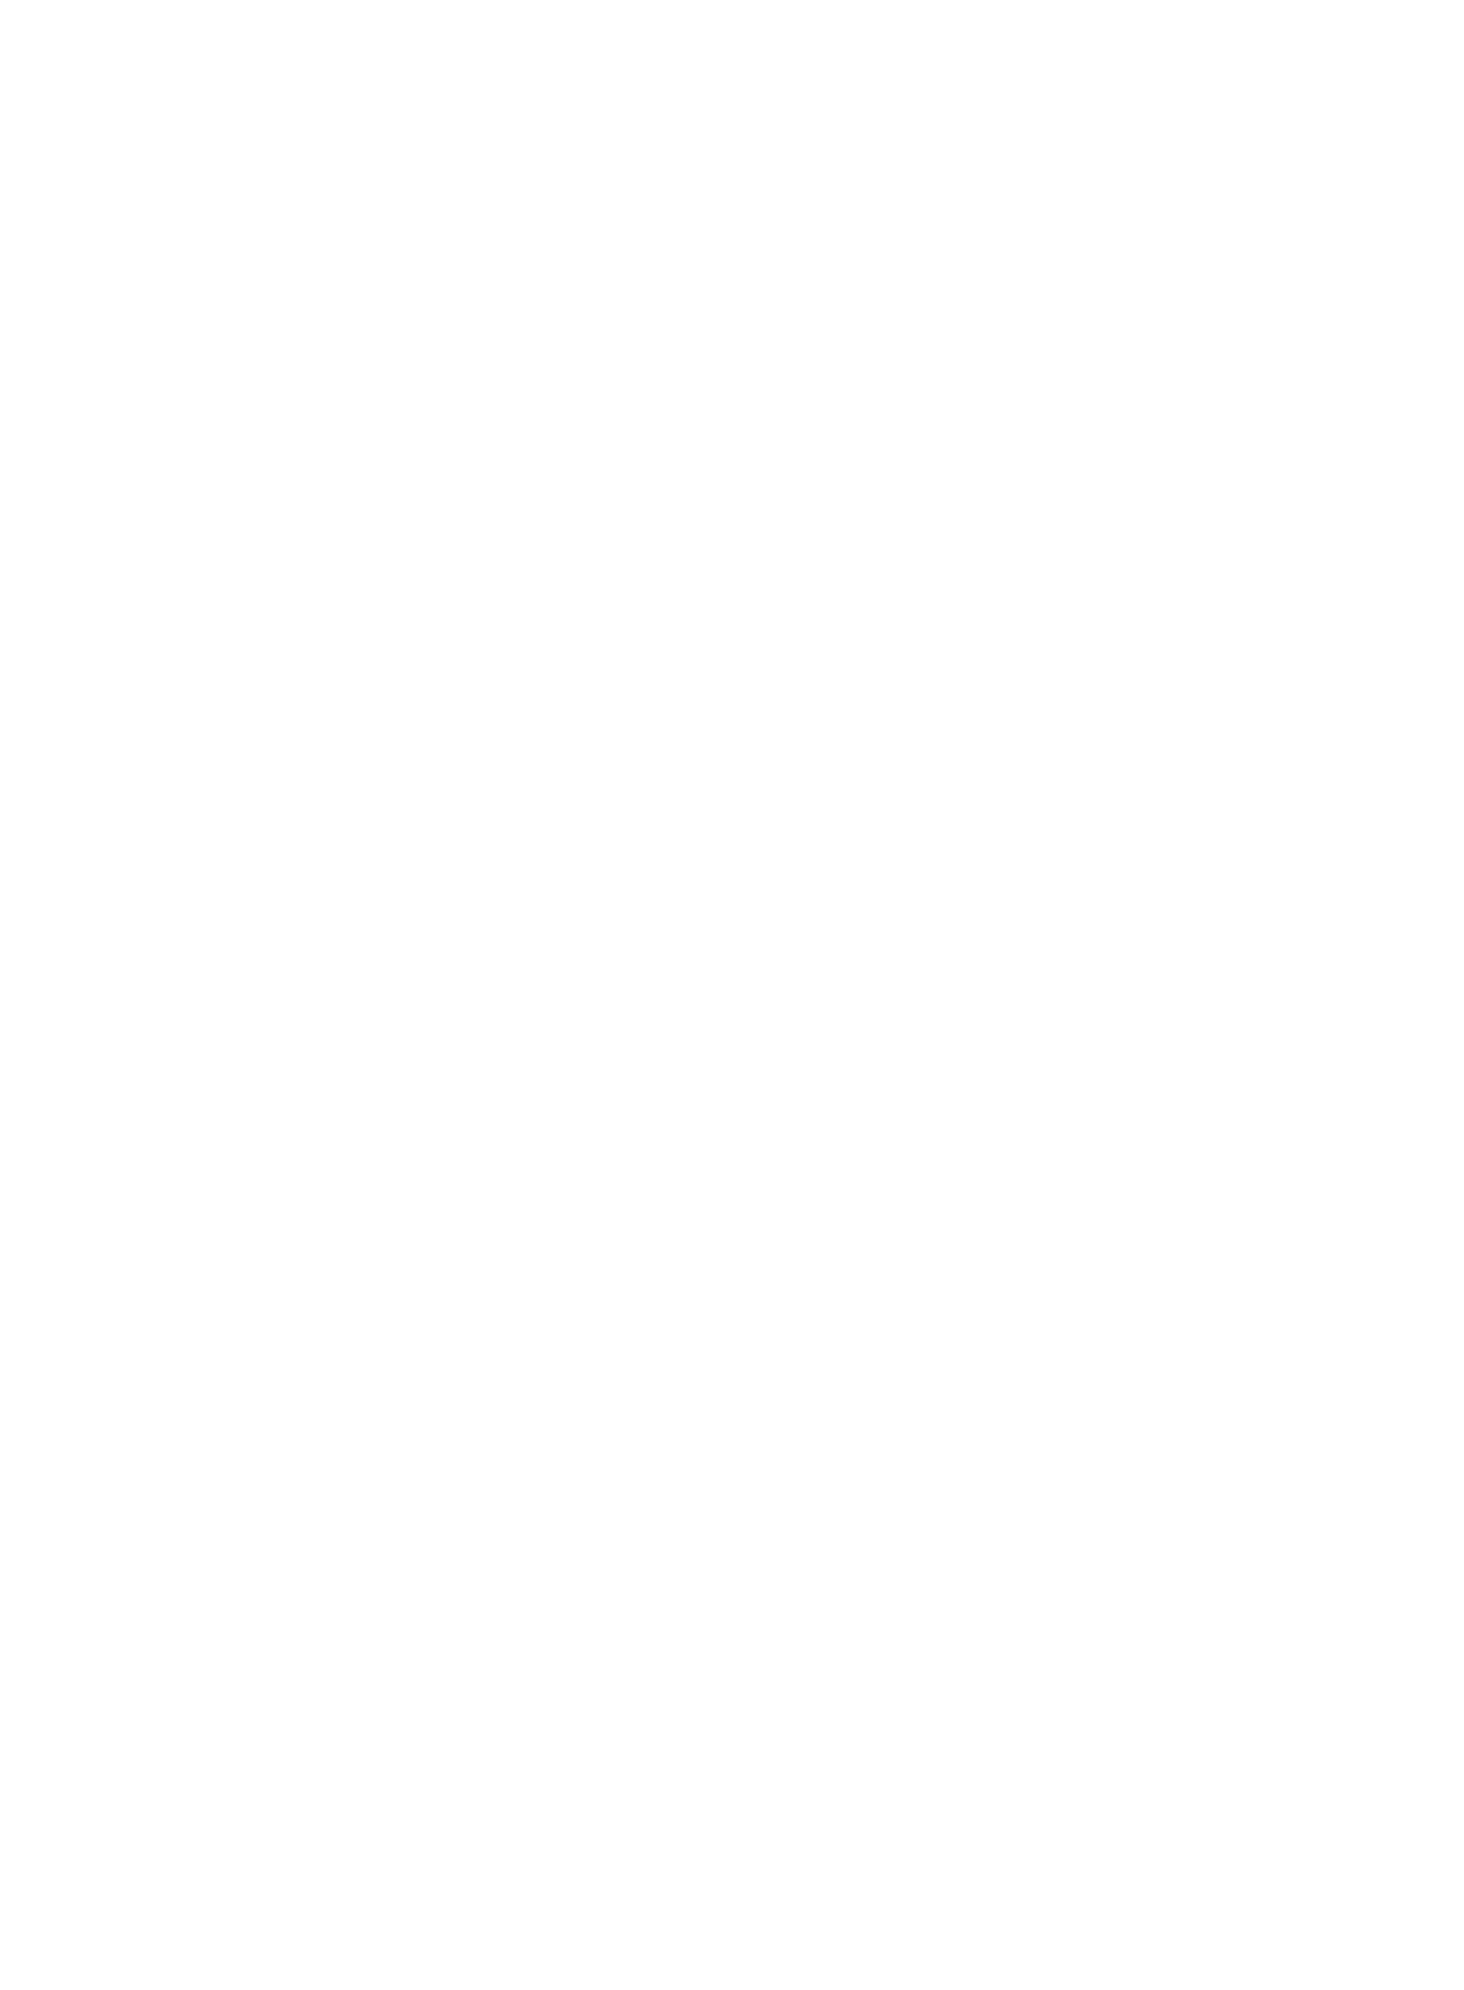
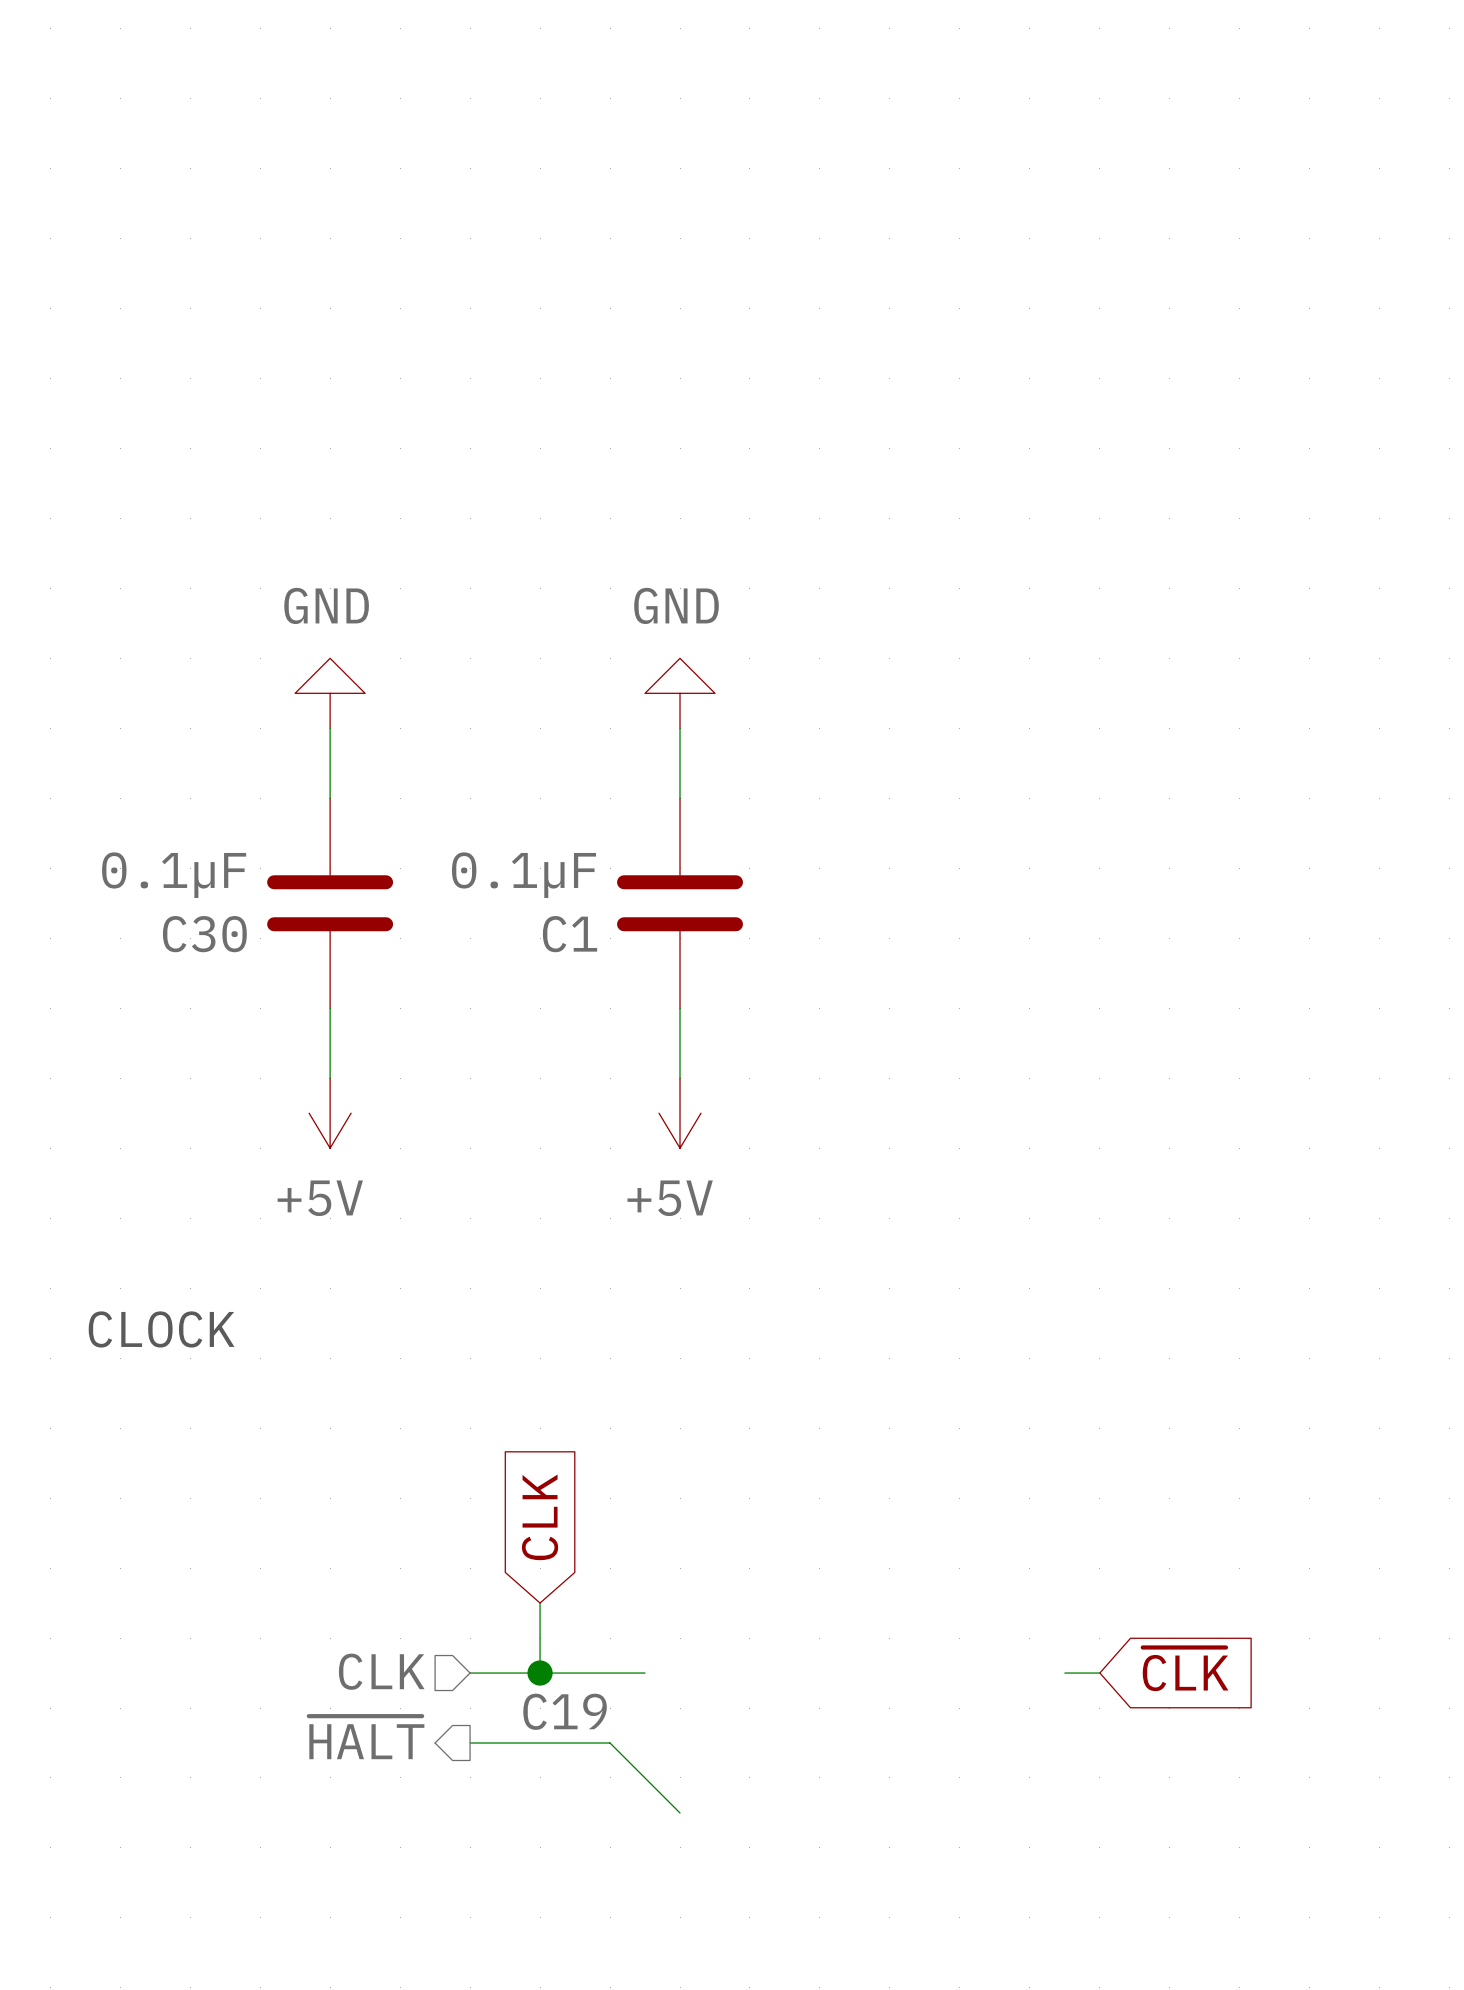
power symbol: none -> GND (330, 693)
power symbol: none -> GND (680, 693)
wire: none -> (330, 728) (330, 798)
wire: none -> (680, 728) (680, 798)
C30: none -> 0.1µF (330, 903)
C1: none -> 0.1µF (680, 903)
wire: none -> (330, 1008) (330, 1078)
wire: none -> (680, 1008) (680, 1078)
power symbol: none -> +5V (330, 1113)
power symbol: none -> +5V (680, 1113)
text: none -> CLOCK (161, 1329)
global label: none -> CLK (540, 1517)
wire: none -> (540, 1603) (540, 1673)
global label: none -> ~{CLK} (1185, 1669)
sheet pin: none -> CLK (381, 1671)
wire: none -> (470, 1673) (645, 1673)
junction: none -> (540, 1673)
wire: none -> (1064, 1673) (1099, 1673)
label: none -> C19 (565, 1711)
sheet pin: none -> ~{HALT} (366, 1737)
wire: none -> (470, 1743) (610, 1743) (680, 1812)

